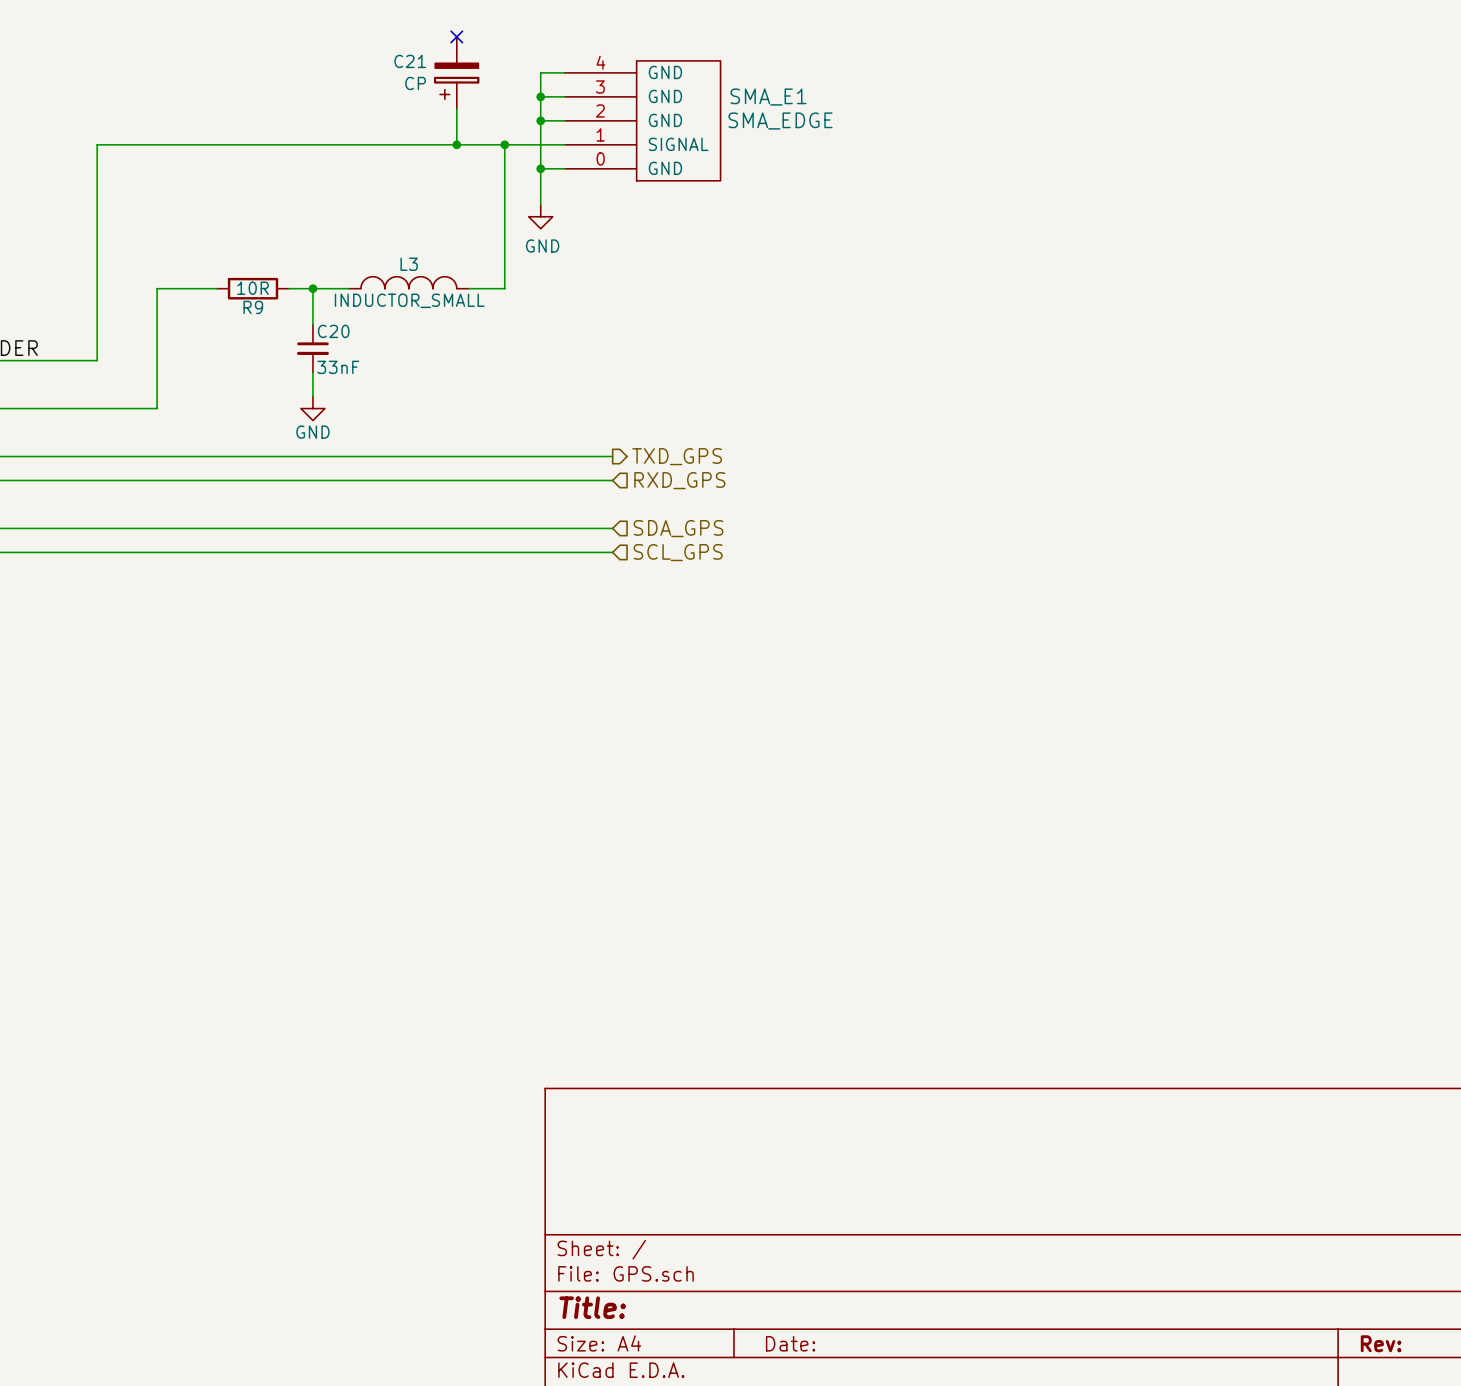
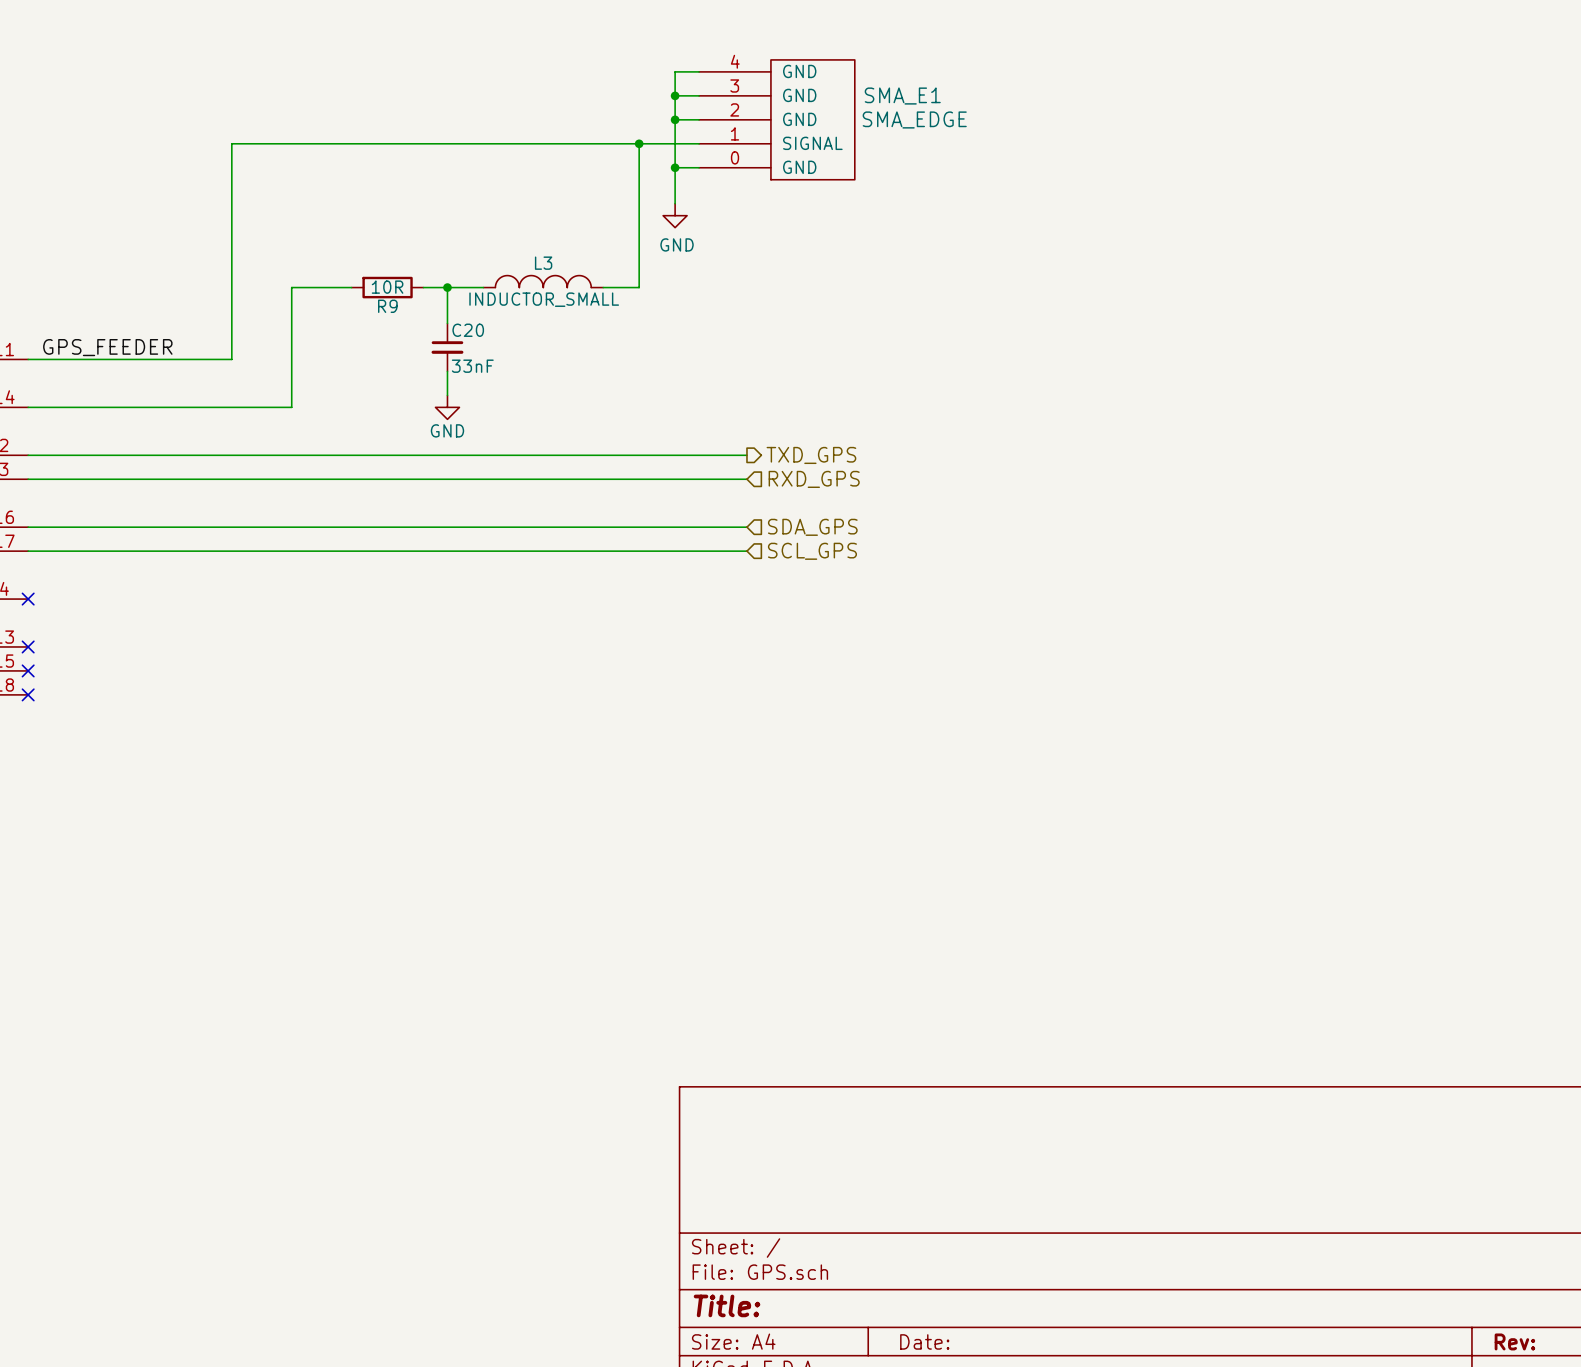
no-connect mark: (456, 36) -> none
C21: CP (456, 72) -> none
wire: (456, 108) (456, 144) -> none
junction: (456, 144) -> none

